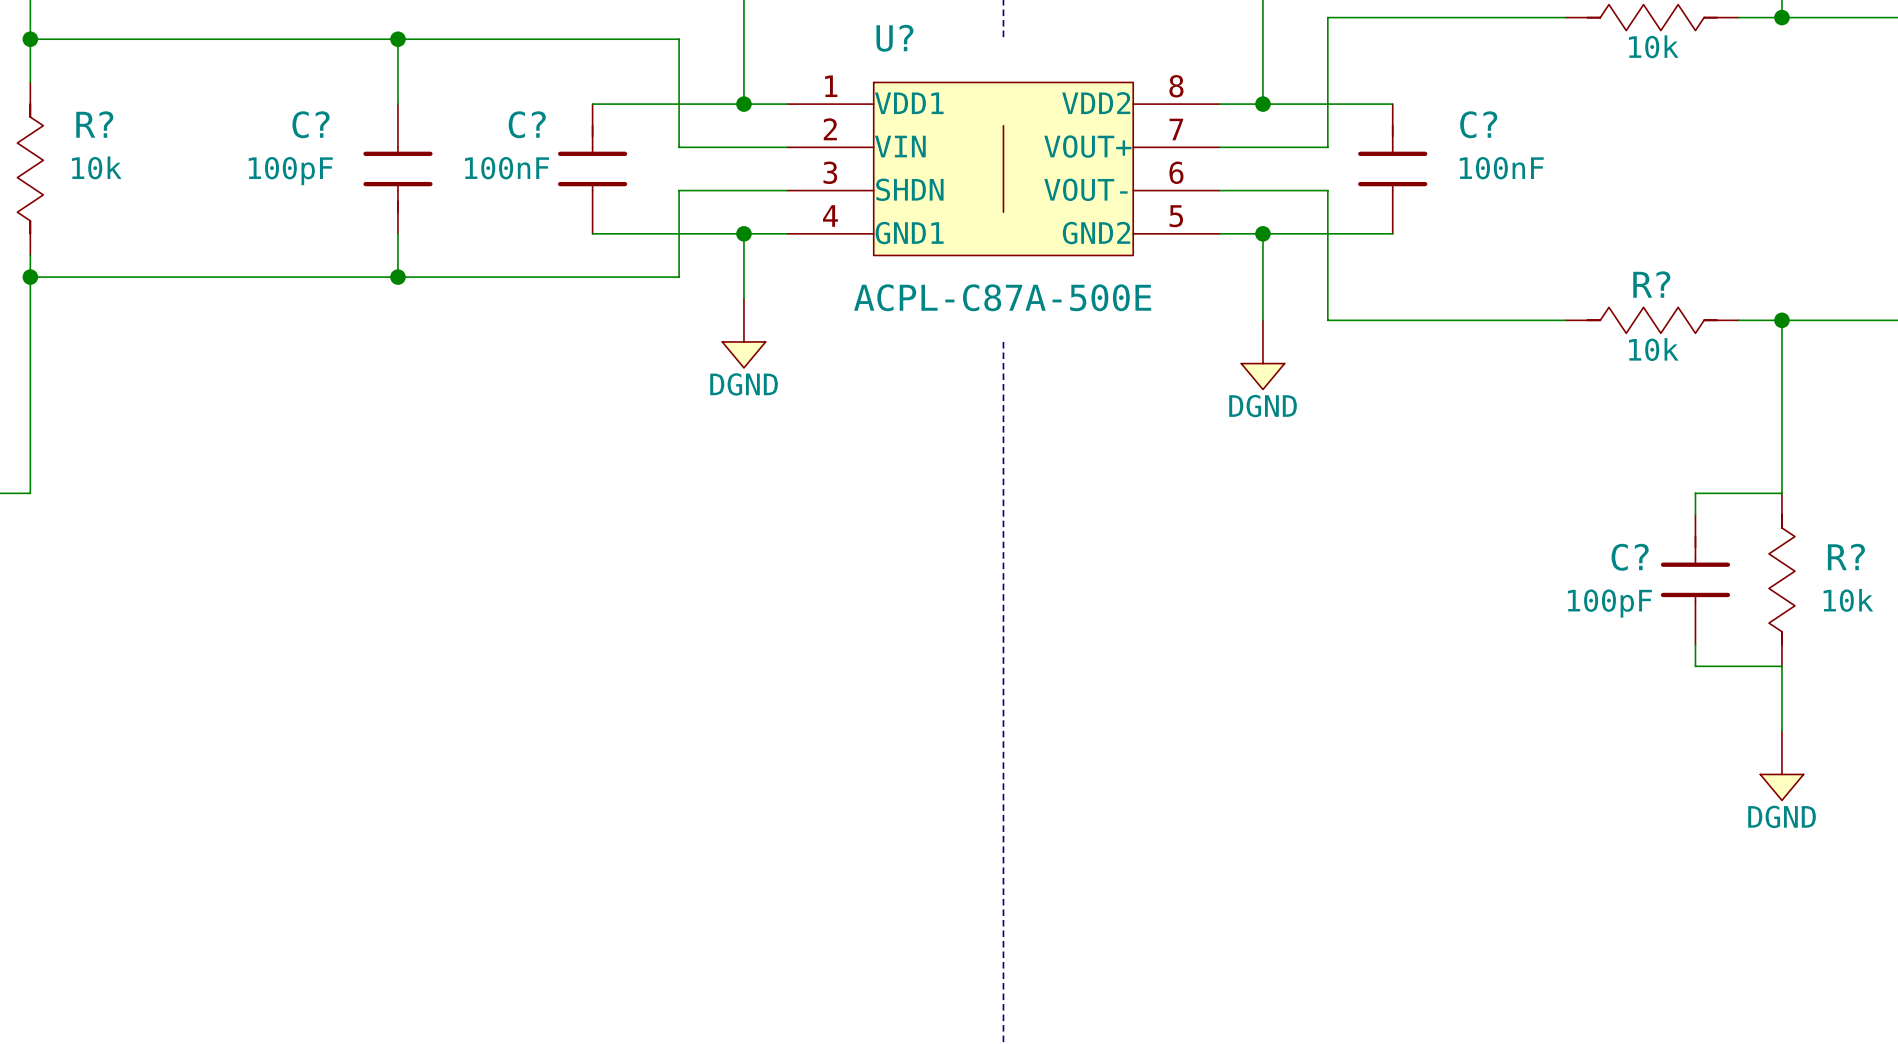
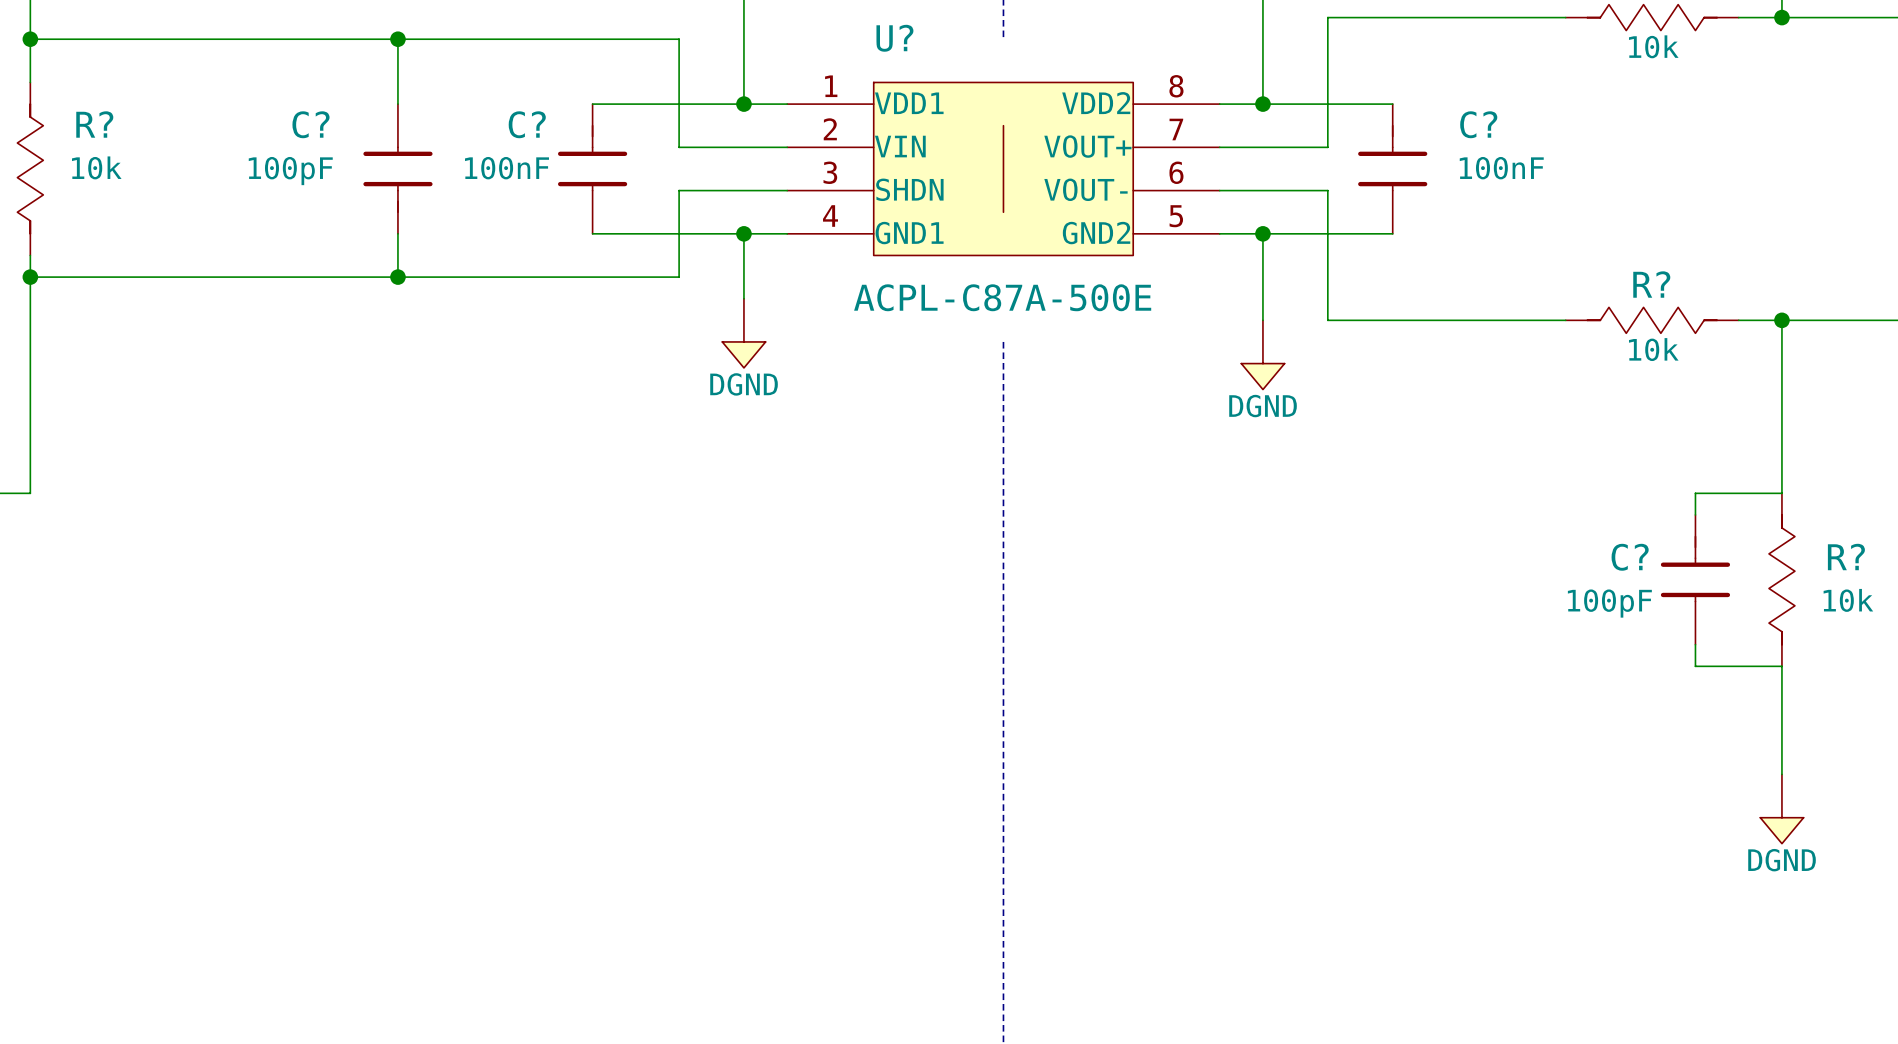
power symbol position: DGND (1781, 765) -> DGND (1781, 809)

